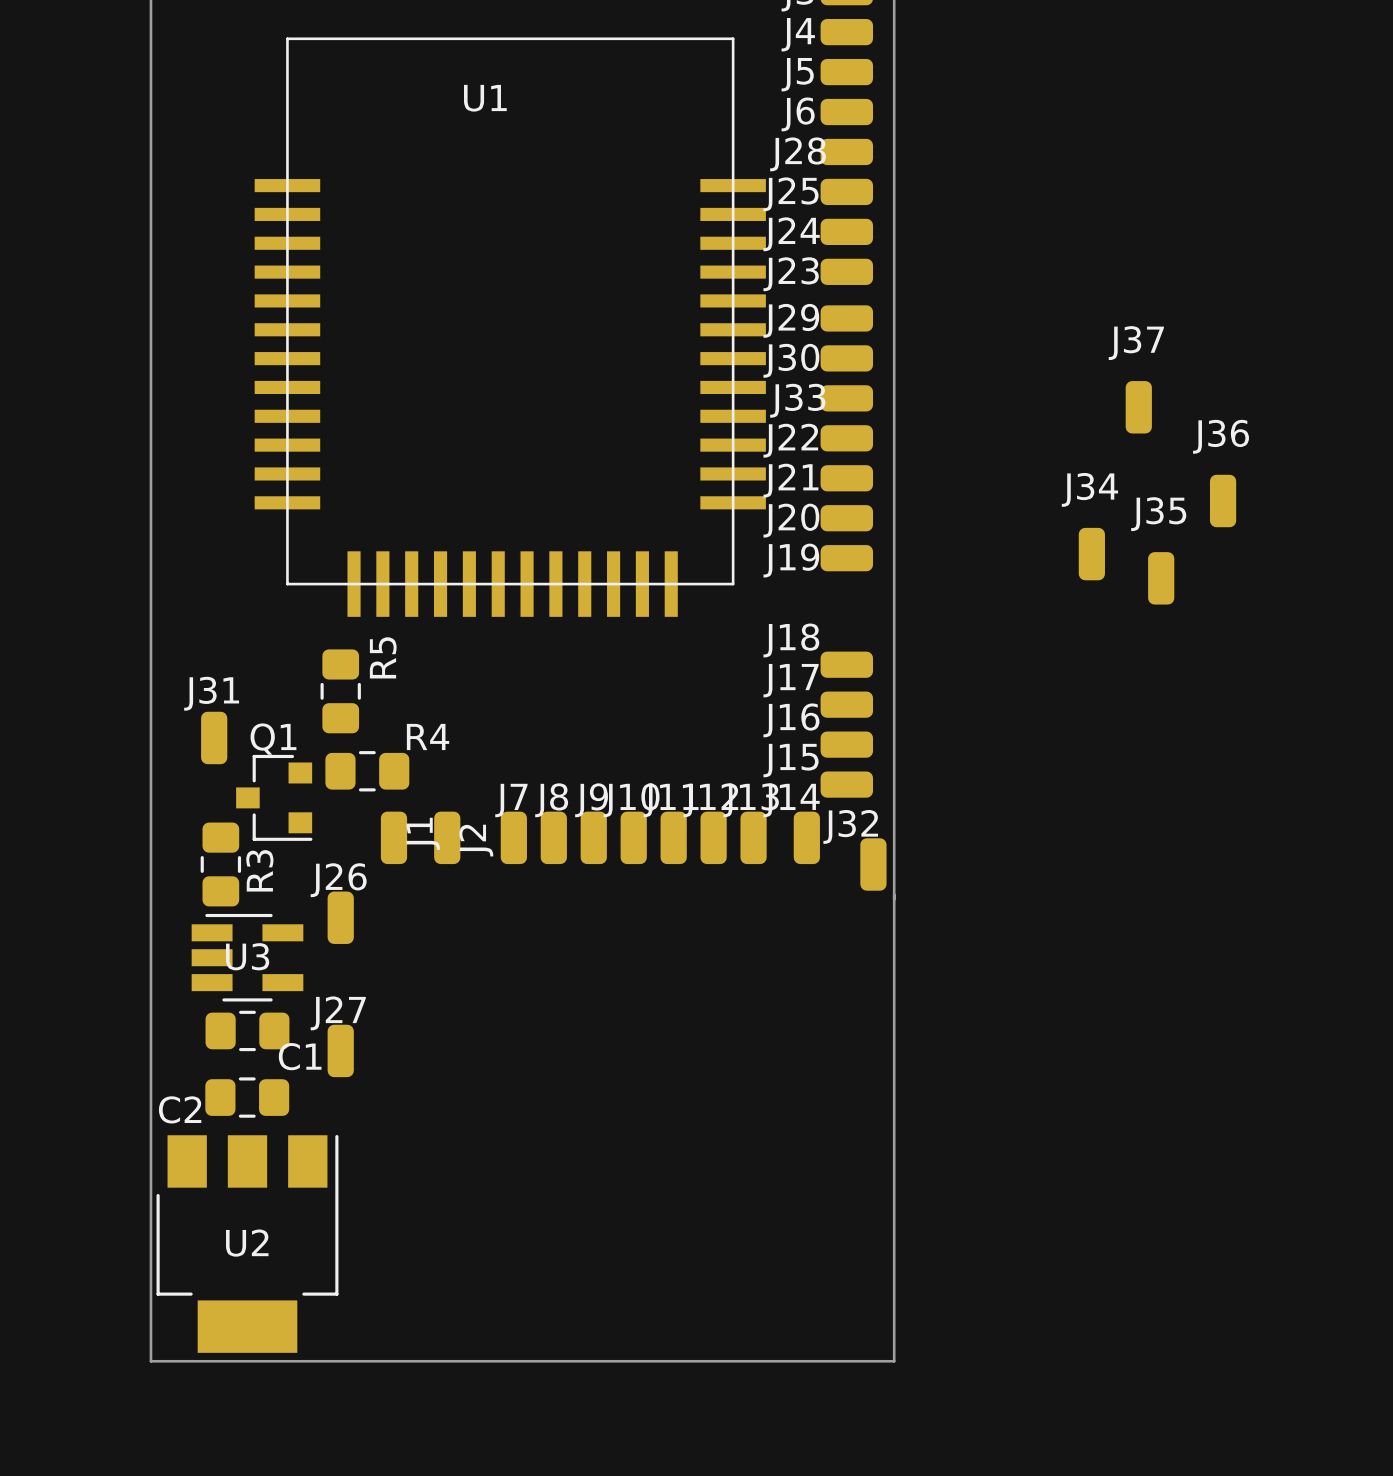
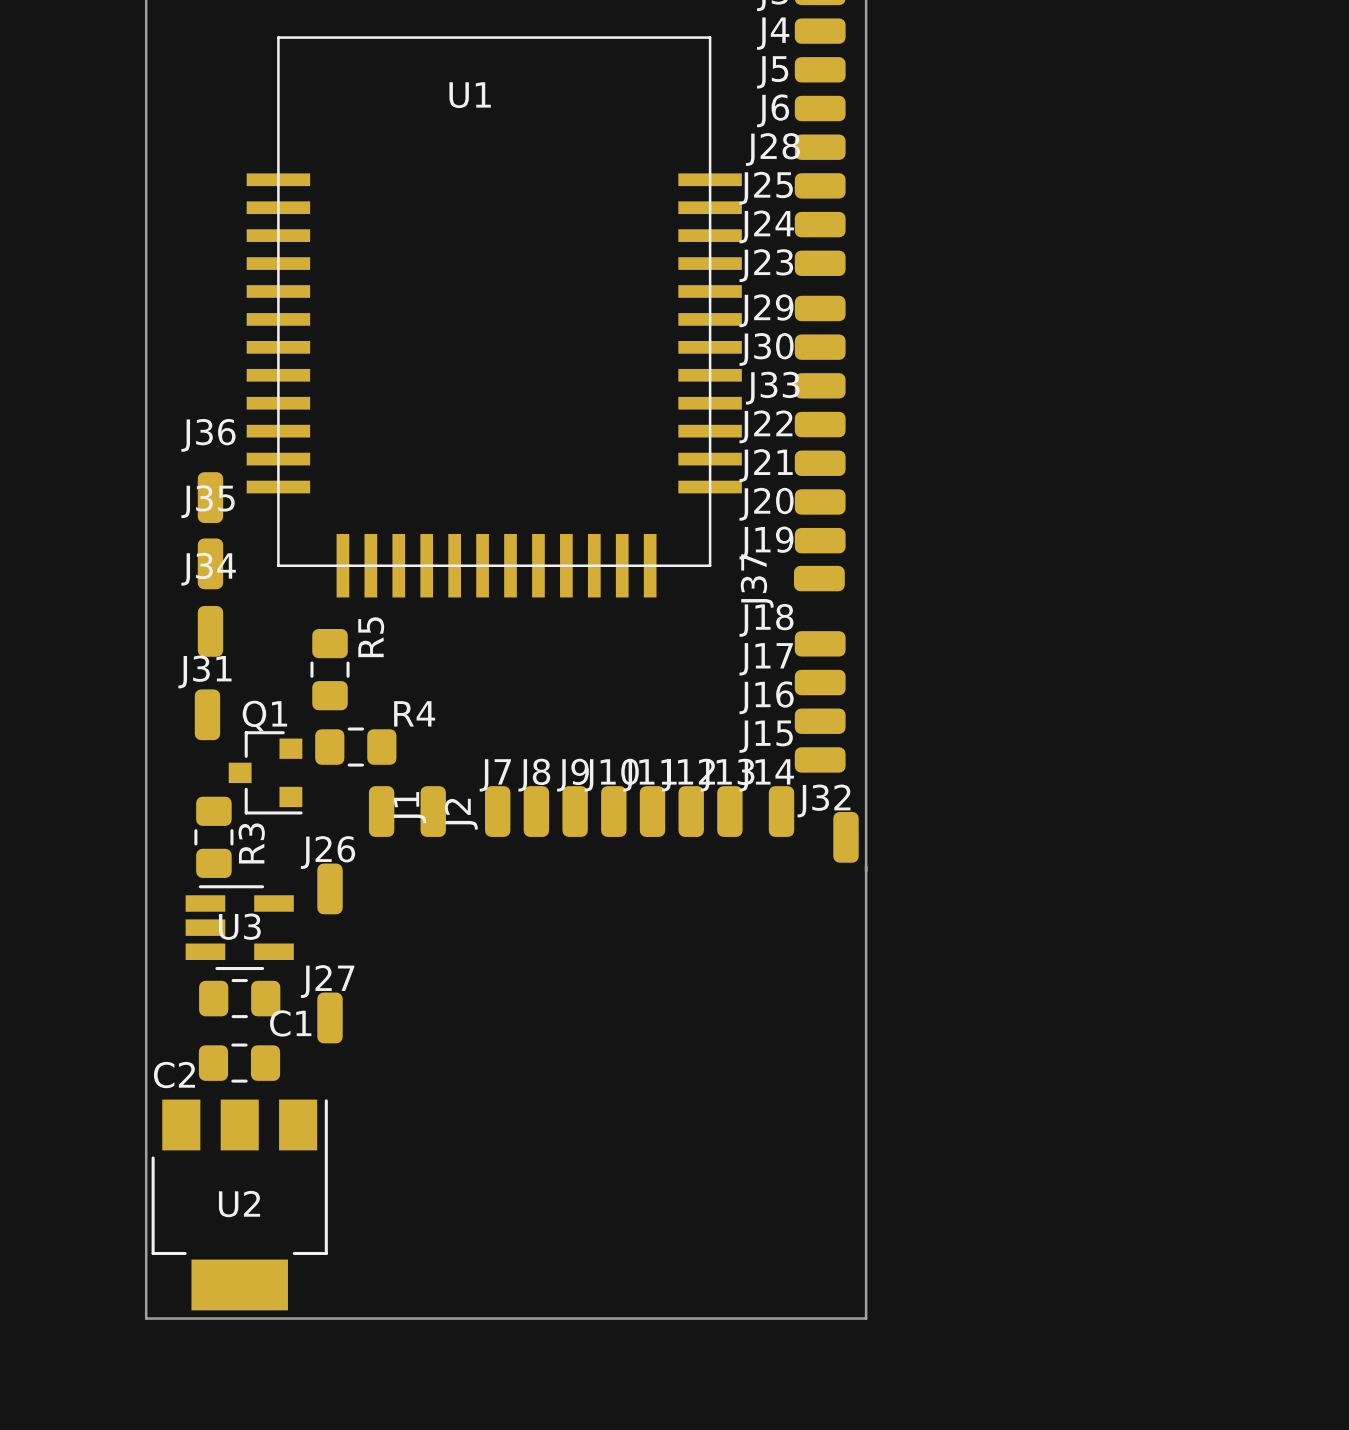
J37 name position: J37 (1136, 343) -> J37 (757, 580)
J37 rotation: 0° (1138, 407) -> 90° clockwise (819, 578)
J37 position: (1138, 407) -> (819, 578)
J36 position: (1223, 501) -> (210, 497)
J34 position: (1091, 554) -> (210, 631)
J35 position: (1161, 578) -> (210, 563)

